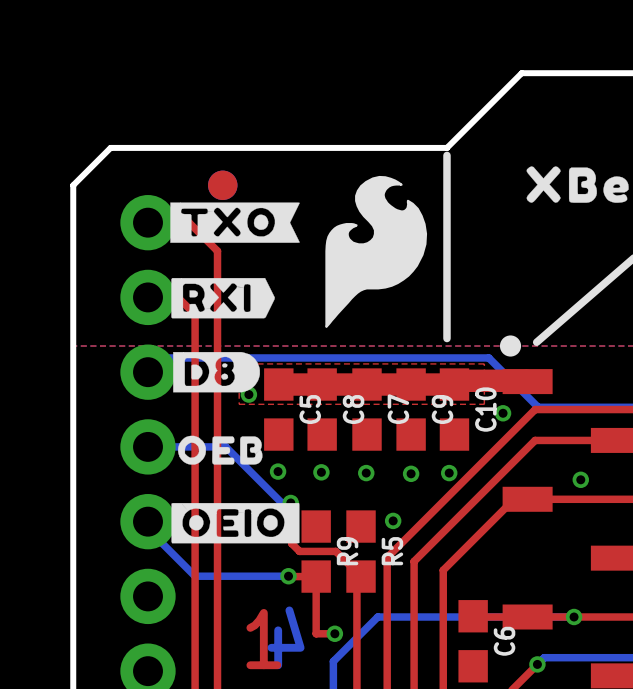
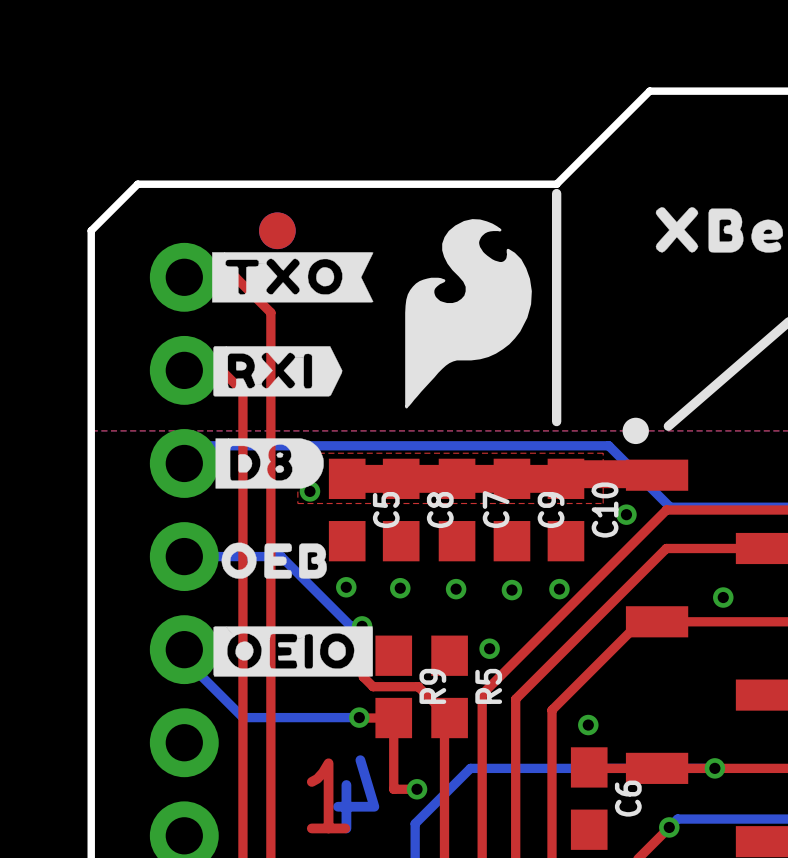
via: none -> (588, 725)

